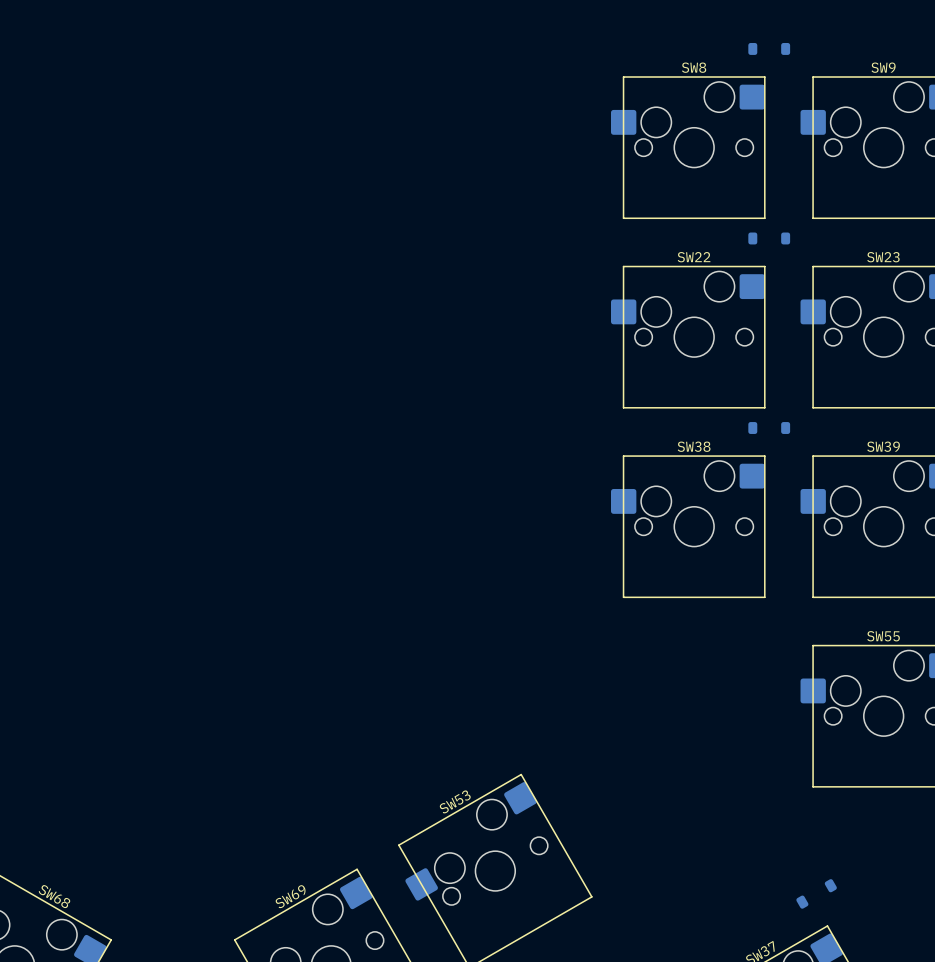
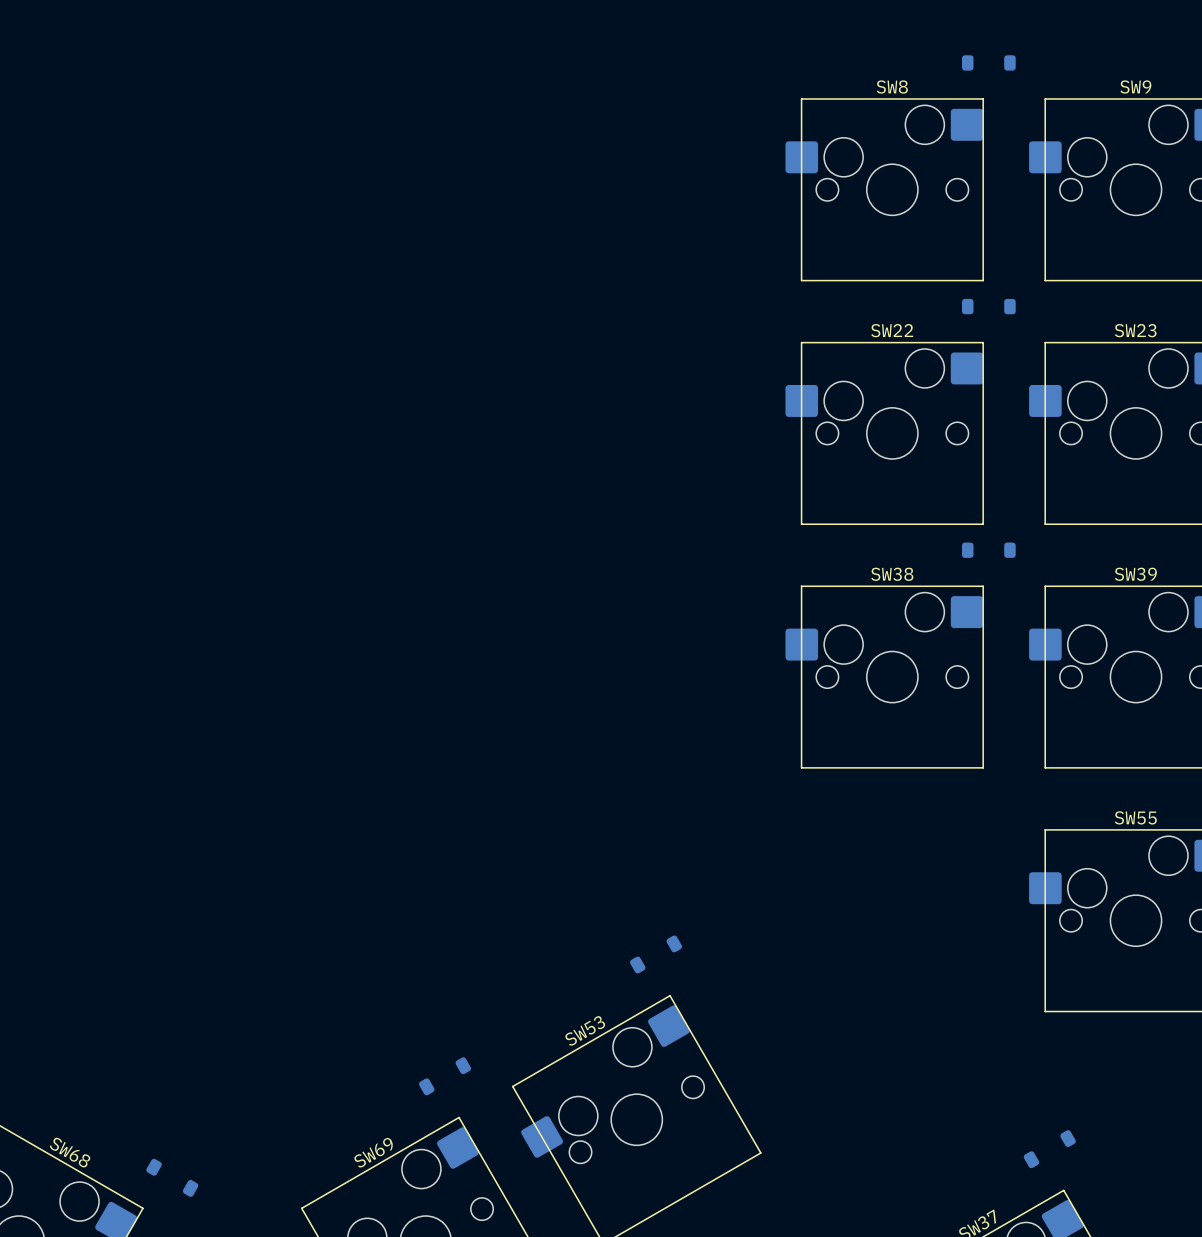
part: none -> (656, 954)
part: none -> (445, 1076)
part: none -> (172, 1177)

